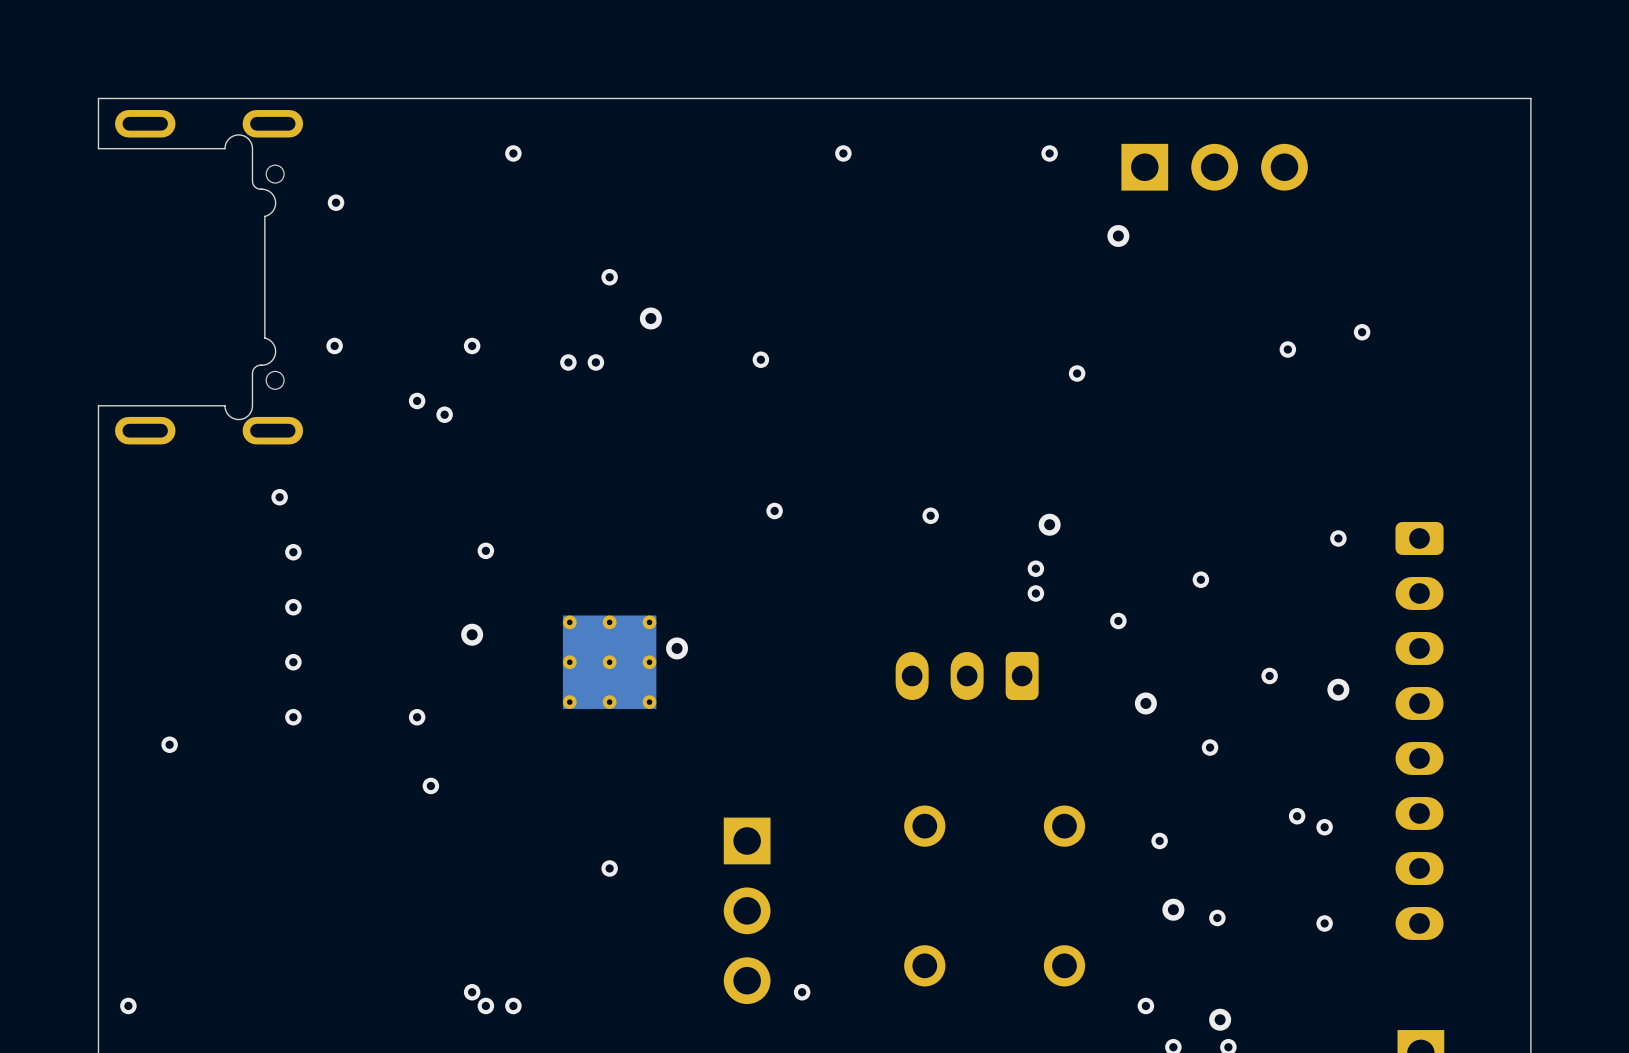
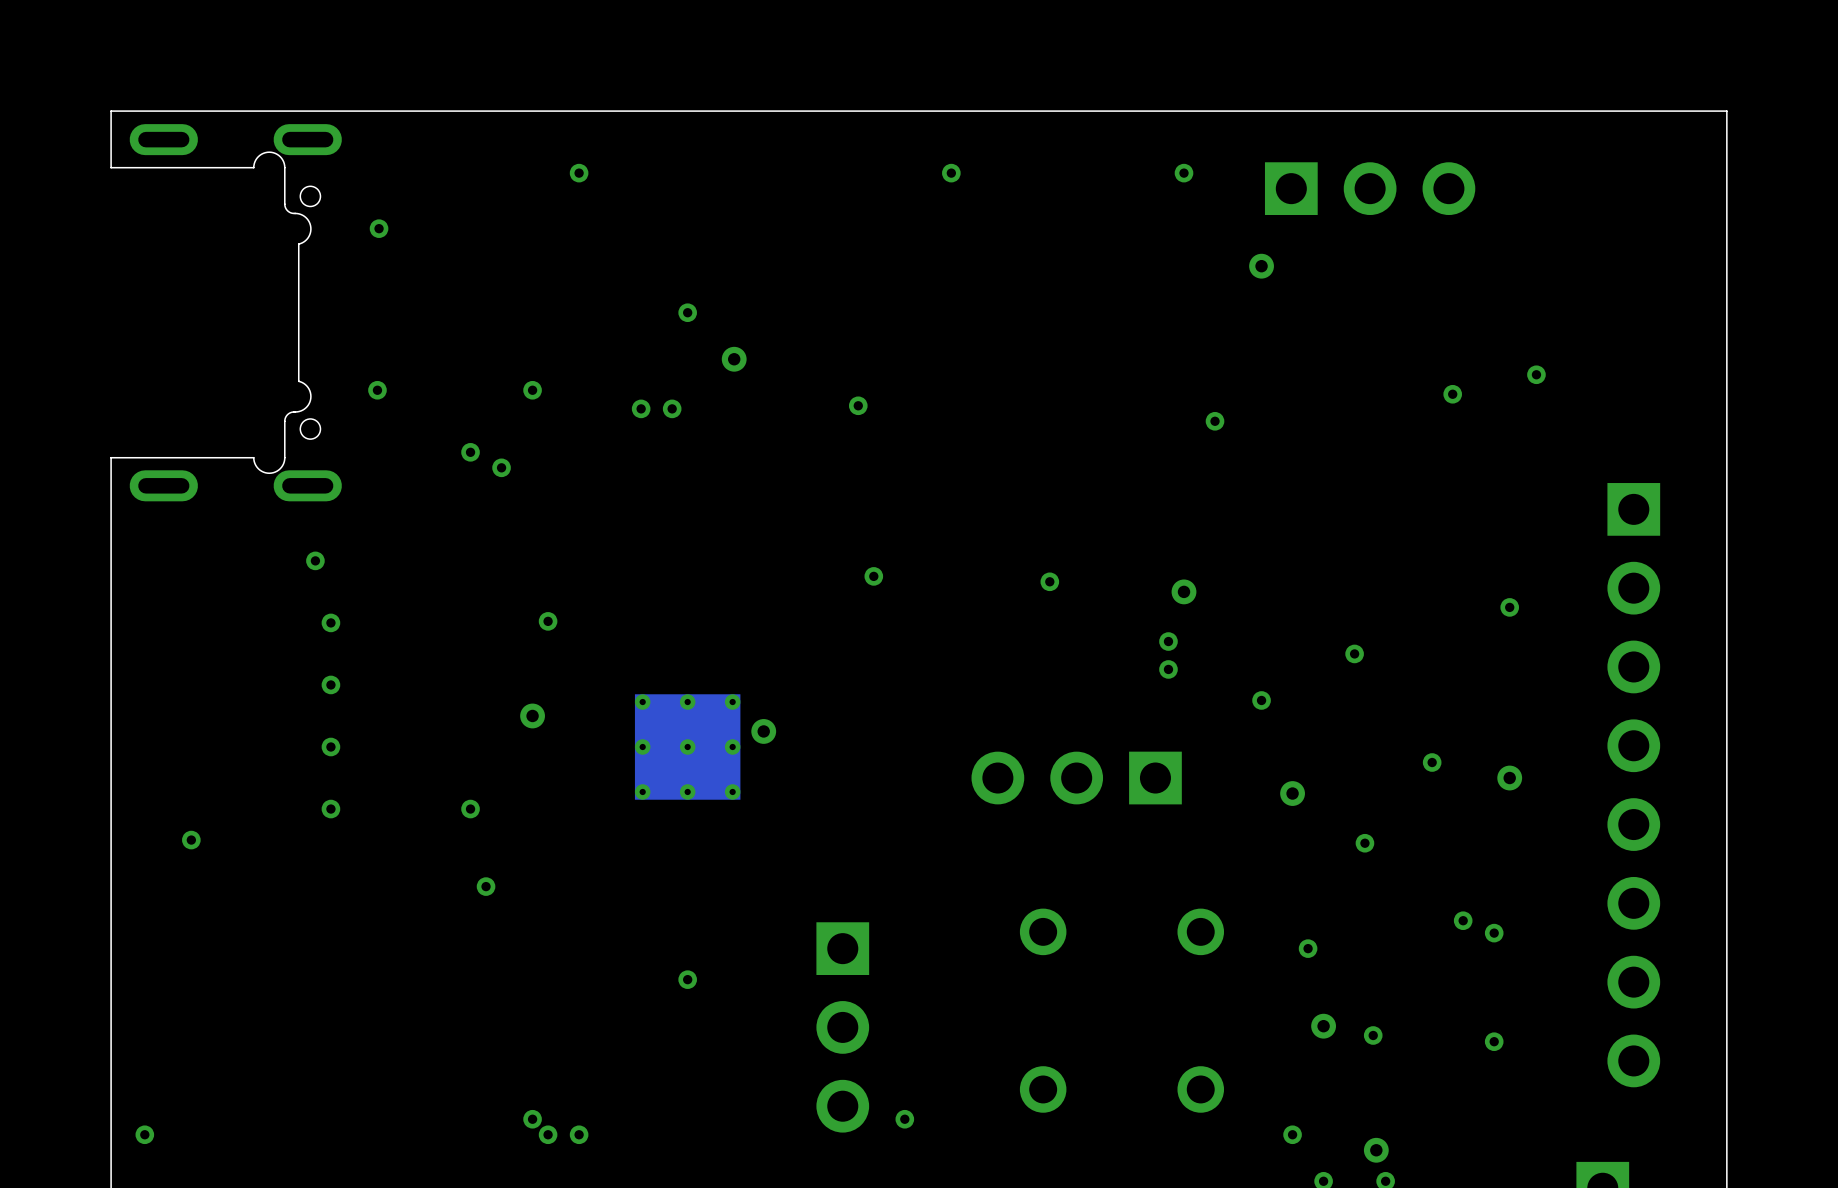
part footprint: [895, 651, 1039, 701] -> [971, 751, 1182, 805]
part: none -> (1633, 785)
part: (1419, 730) -> none

